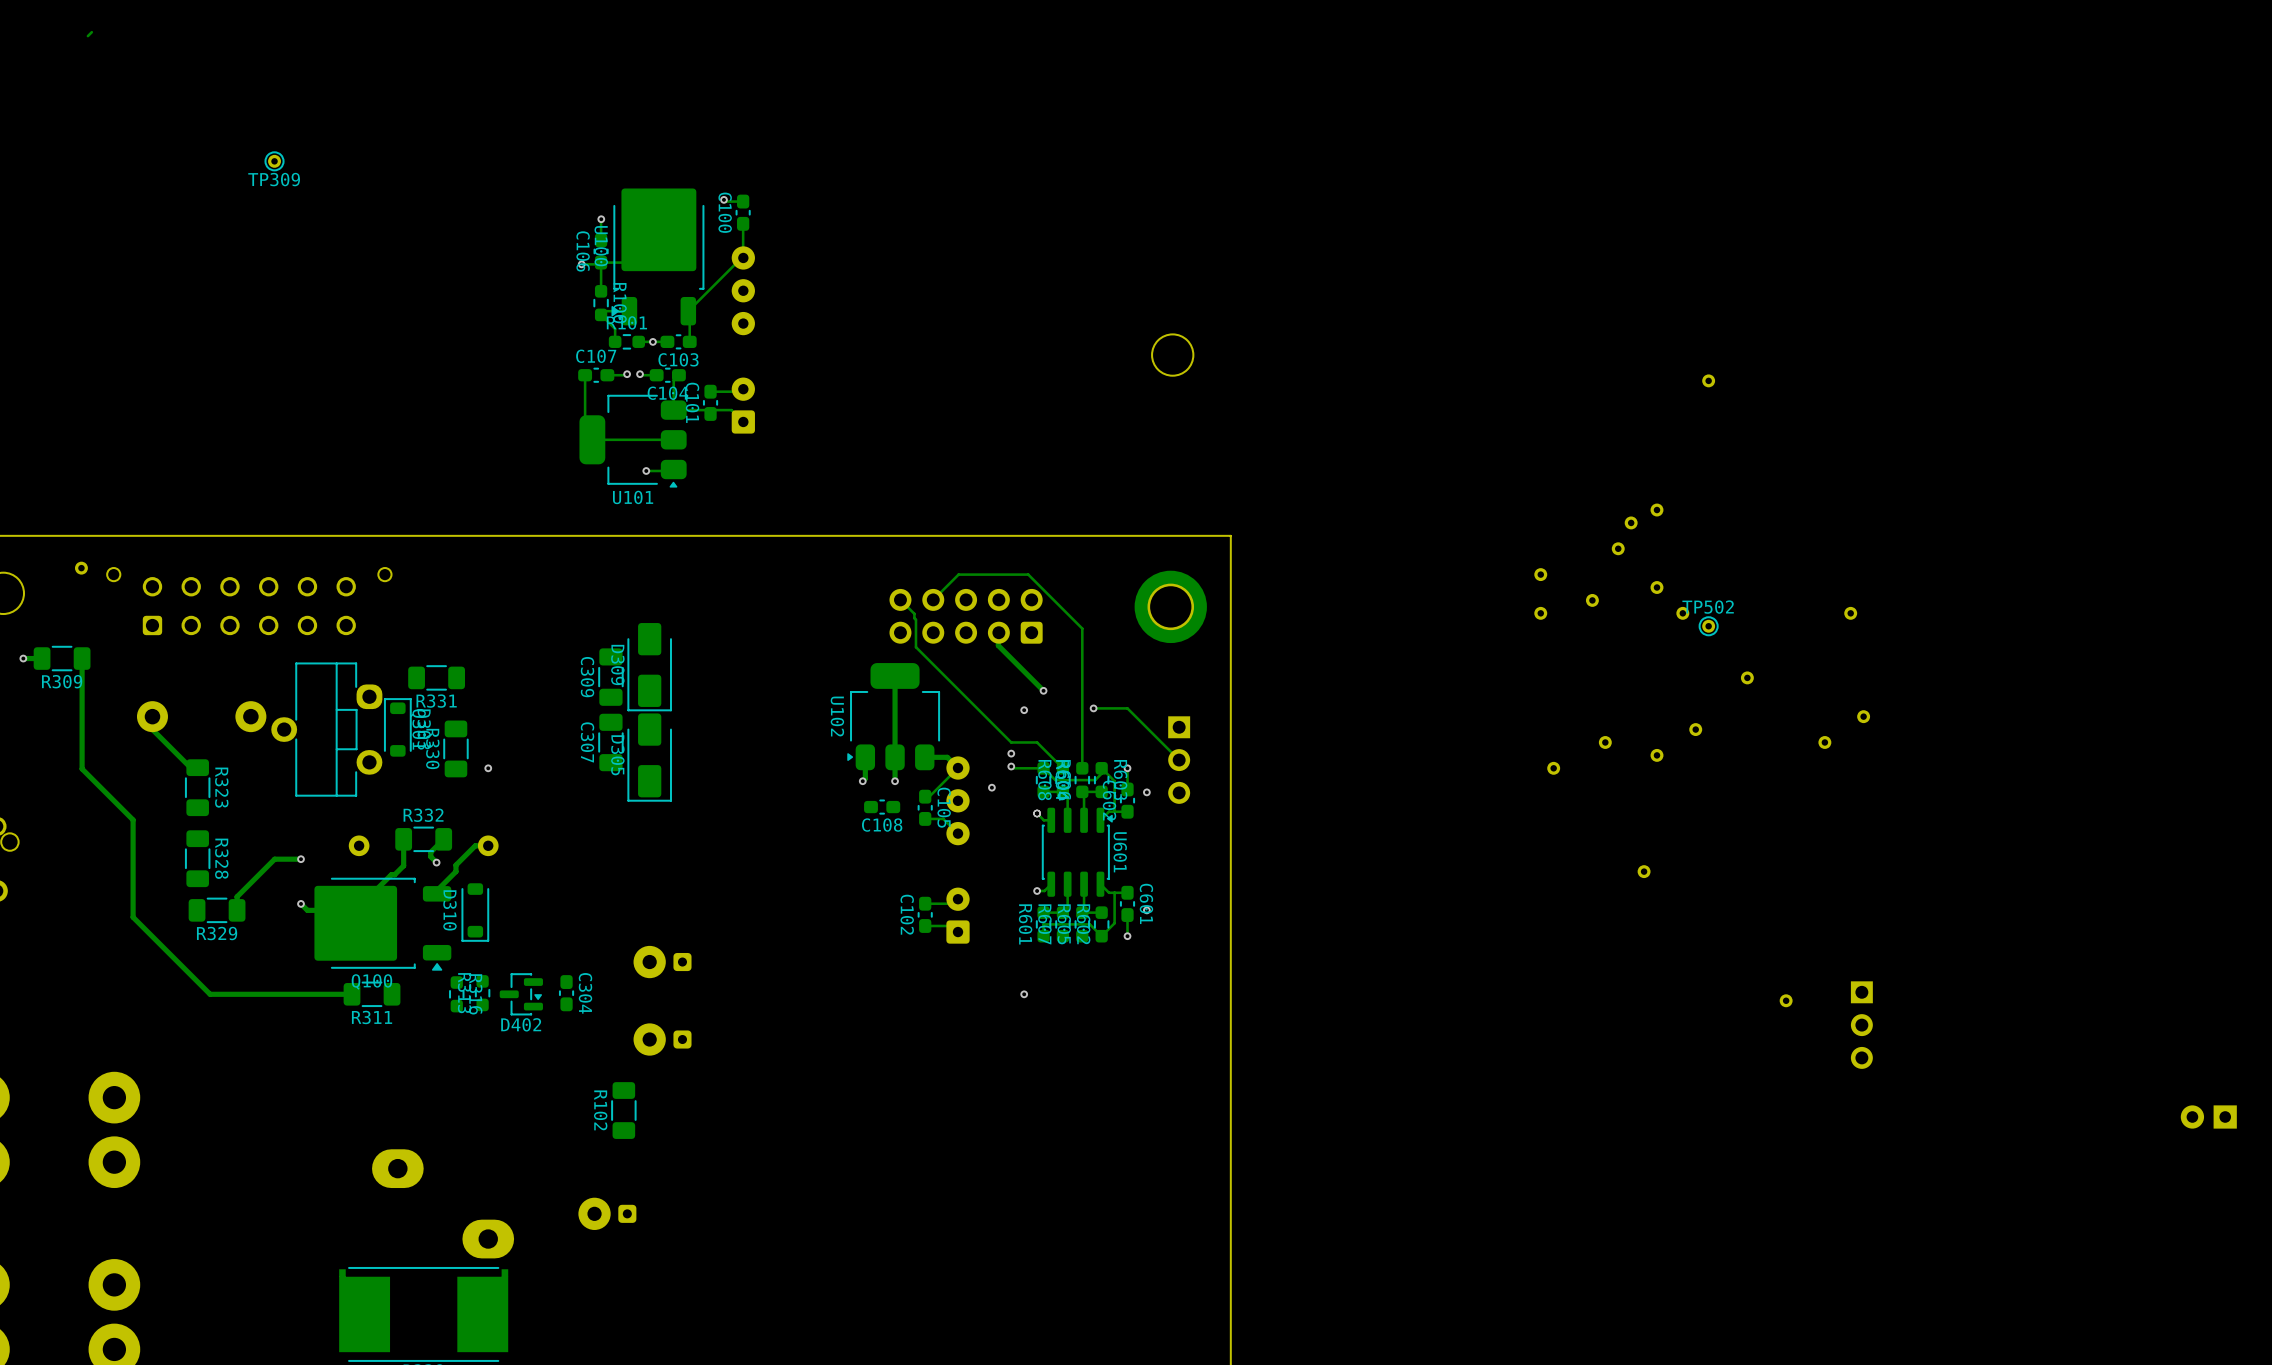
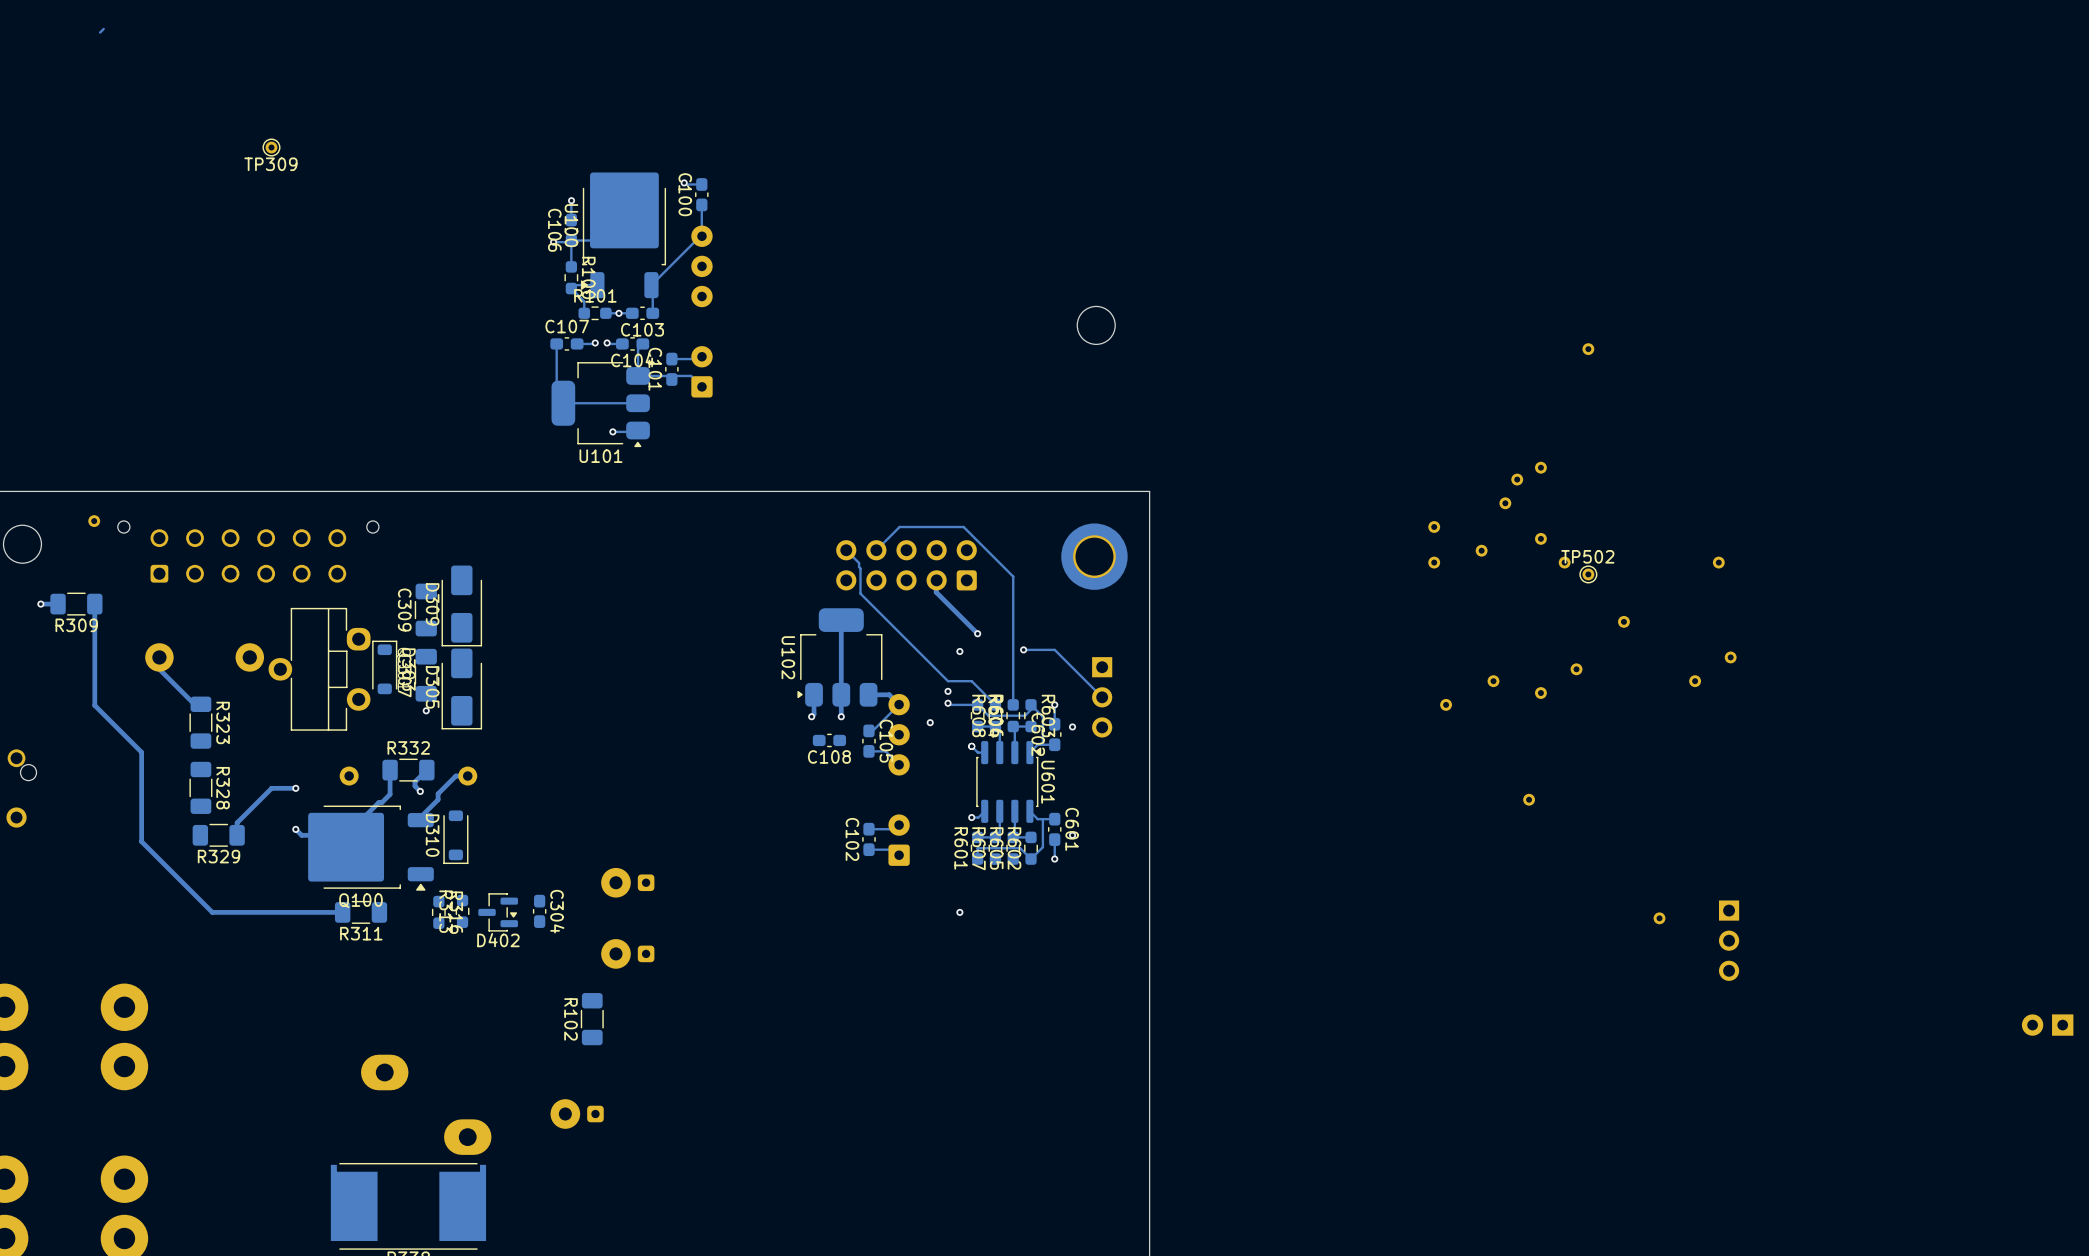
D309 position: (649, 667) -> (461, 605)
R331: (436, 677) -> none
C309 position: (610, 677) -> (426, 610)
C307 position: (610, 742) -> (426, 675)
R330: (455, 748) -> none
D305 position: (649, 757) -> (461, 688)
via position: (488, 768) -> (426, 710)

